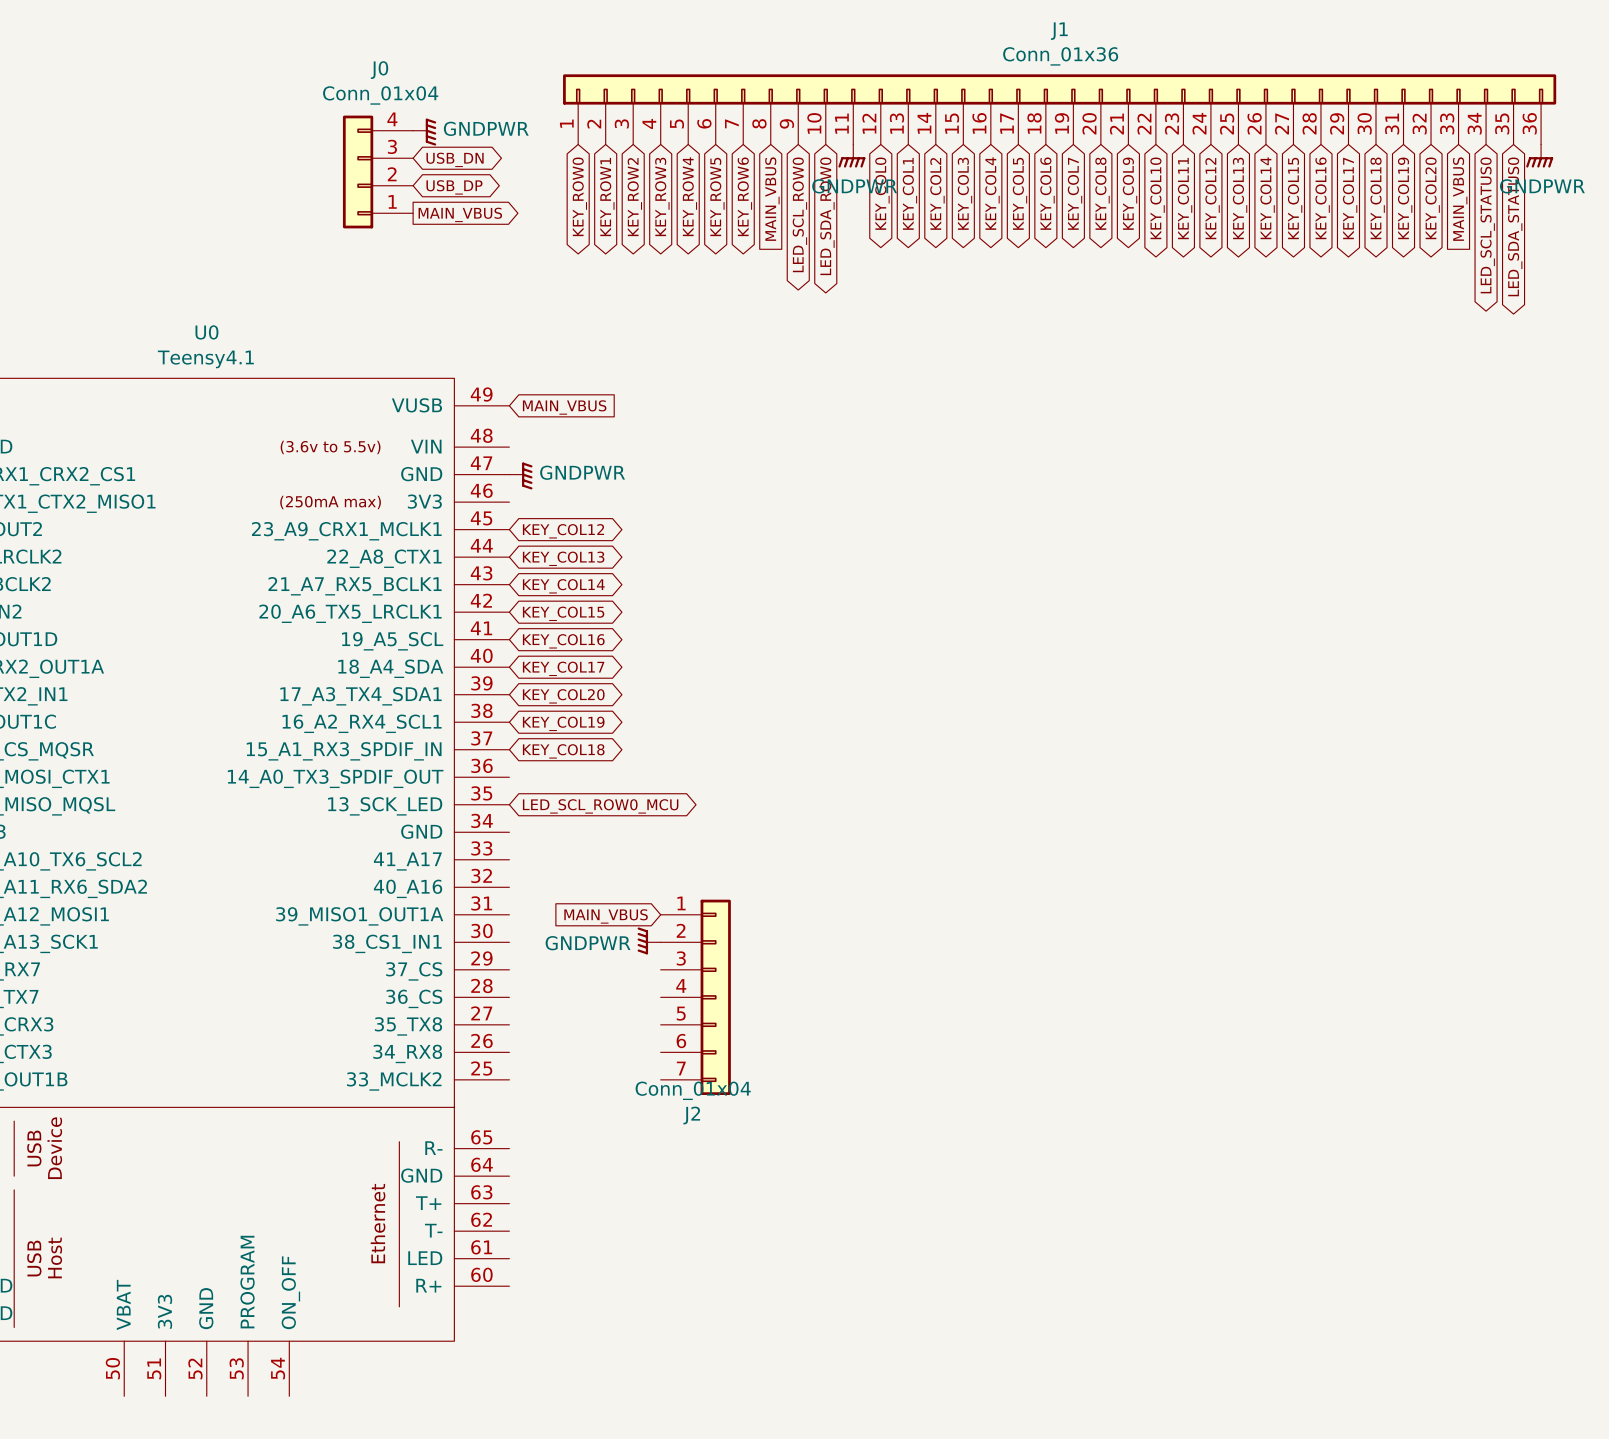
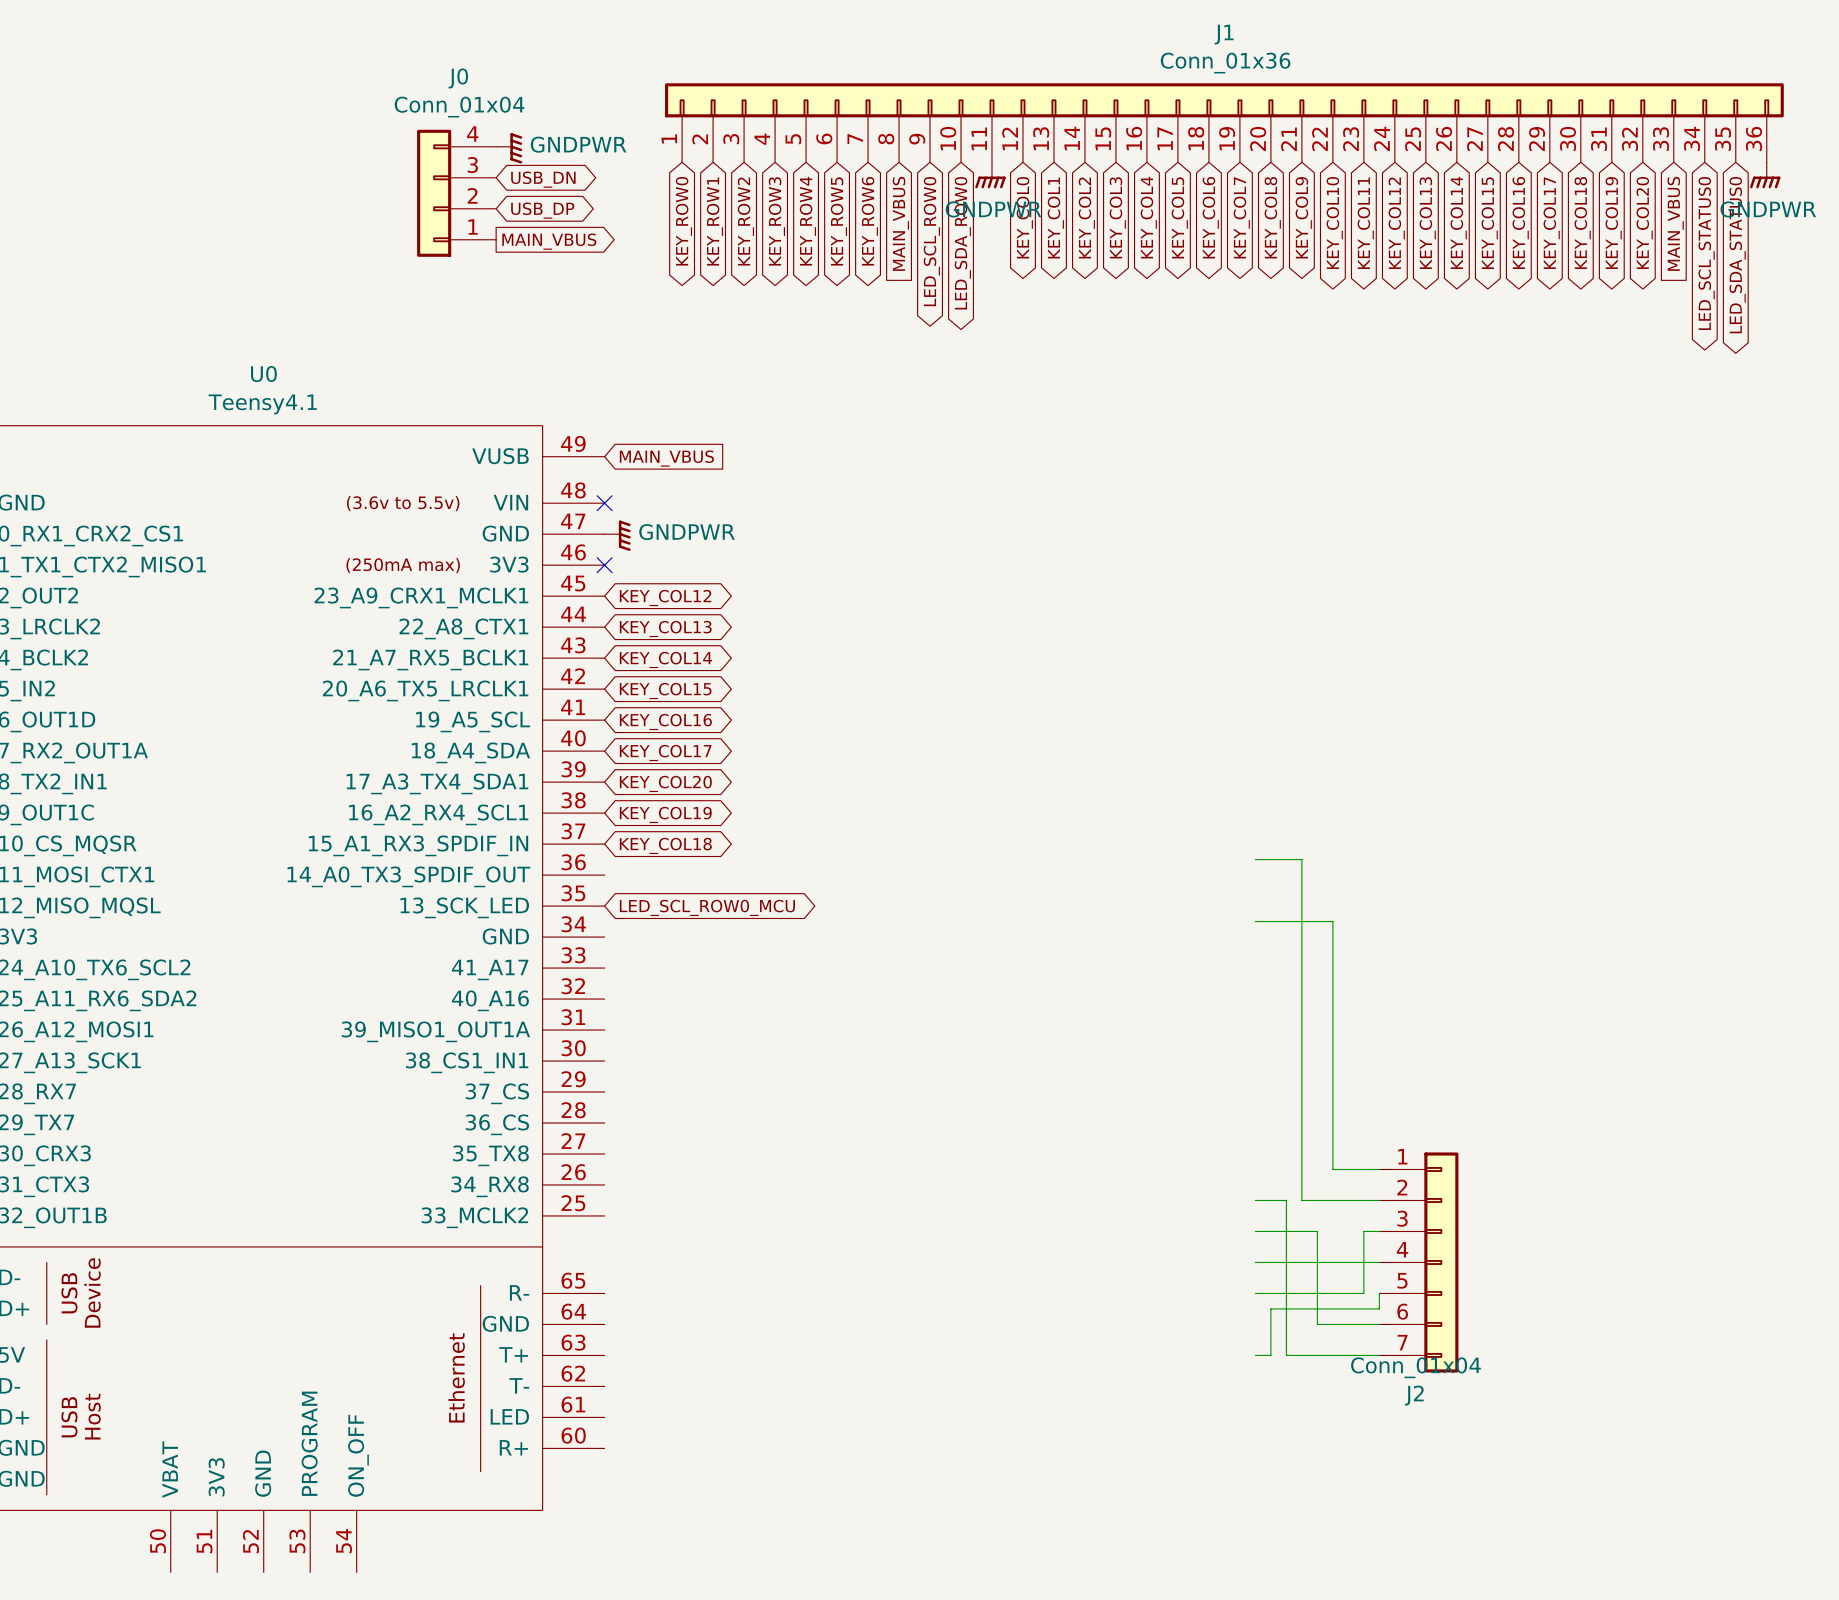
no-connect mark: none -> (604, 503)
no-connect mark: none -> (604, 565)
wire: none -> (1255, 859) (1301, 859) (1301, 1200) (1379, 1200)
wire: none -> (1255, 921) (1332, 921) (1332, 1169) (1379, 1169)
global label: MAIN_VBUS (606, 916) -> none
power symbol: GNDPWR (649, 940) -> none
J2 position: (695, 997) -> (1418, 1262)
wire: none -> (1255, 1200) (1286, 1200) (1286, 1355) (1379, 1355)
wire: none -> (1255, 1231) (1317, 1231) (1317, 1324) (1379, 1324)
wire: none -> (1379, 1231) (1363, 1231) (1363, 1293) (1255, 1293)
wire: none -> (1255, 1262) (1379, 1262)
wire: none -> (1379, 1293) (1379, 1308) (1270, 1308) (1270, 1355) (1255, 1355)

